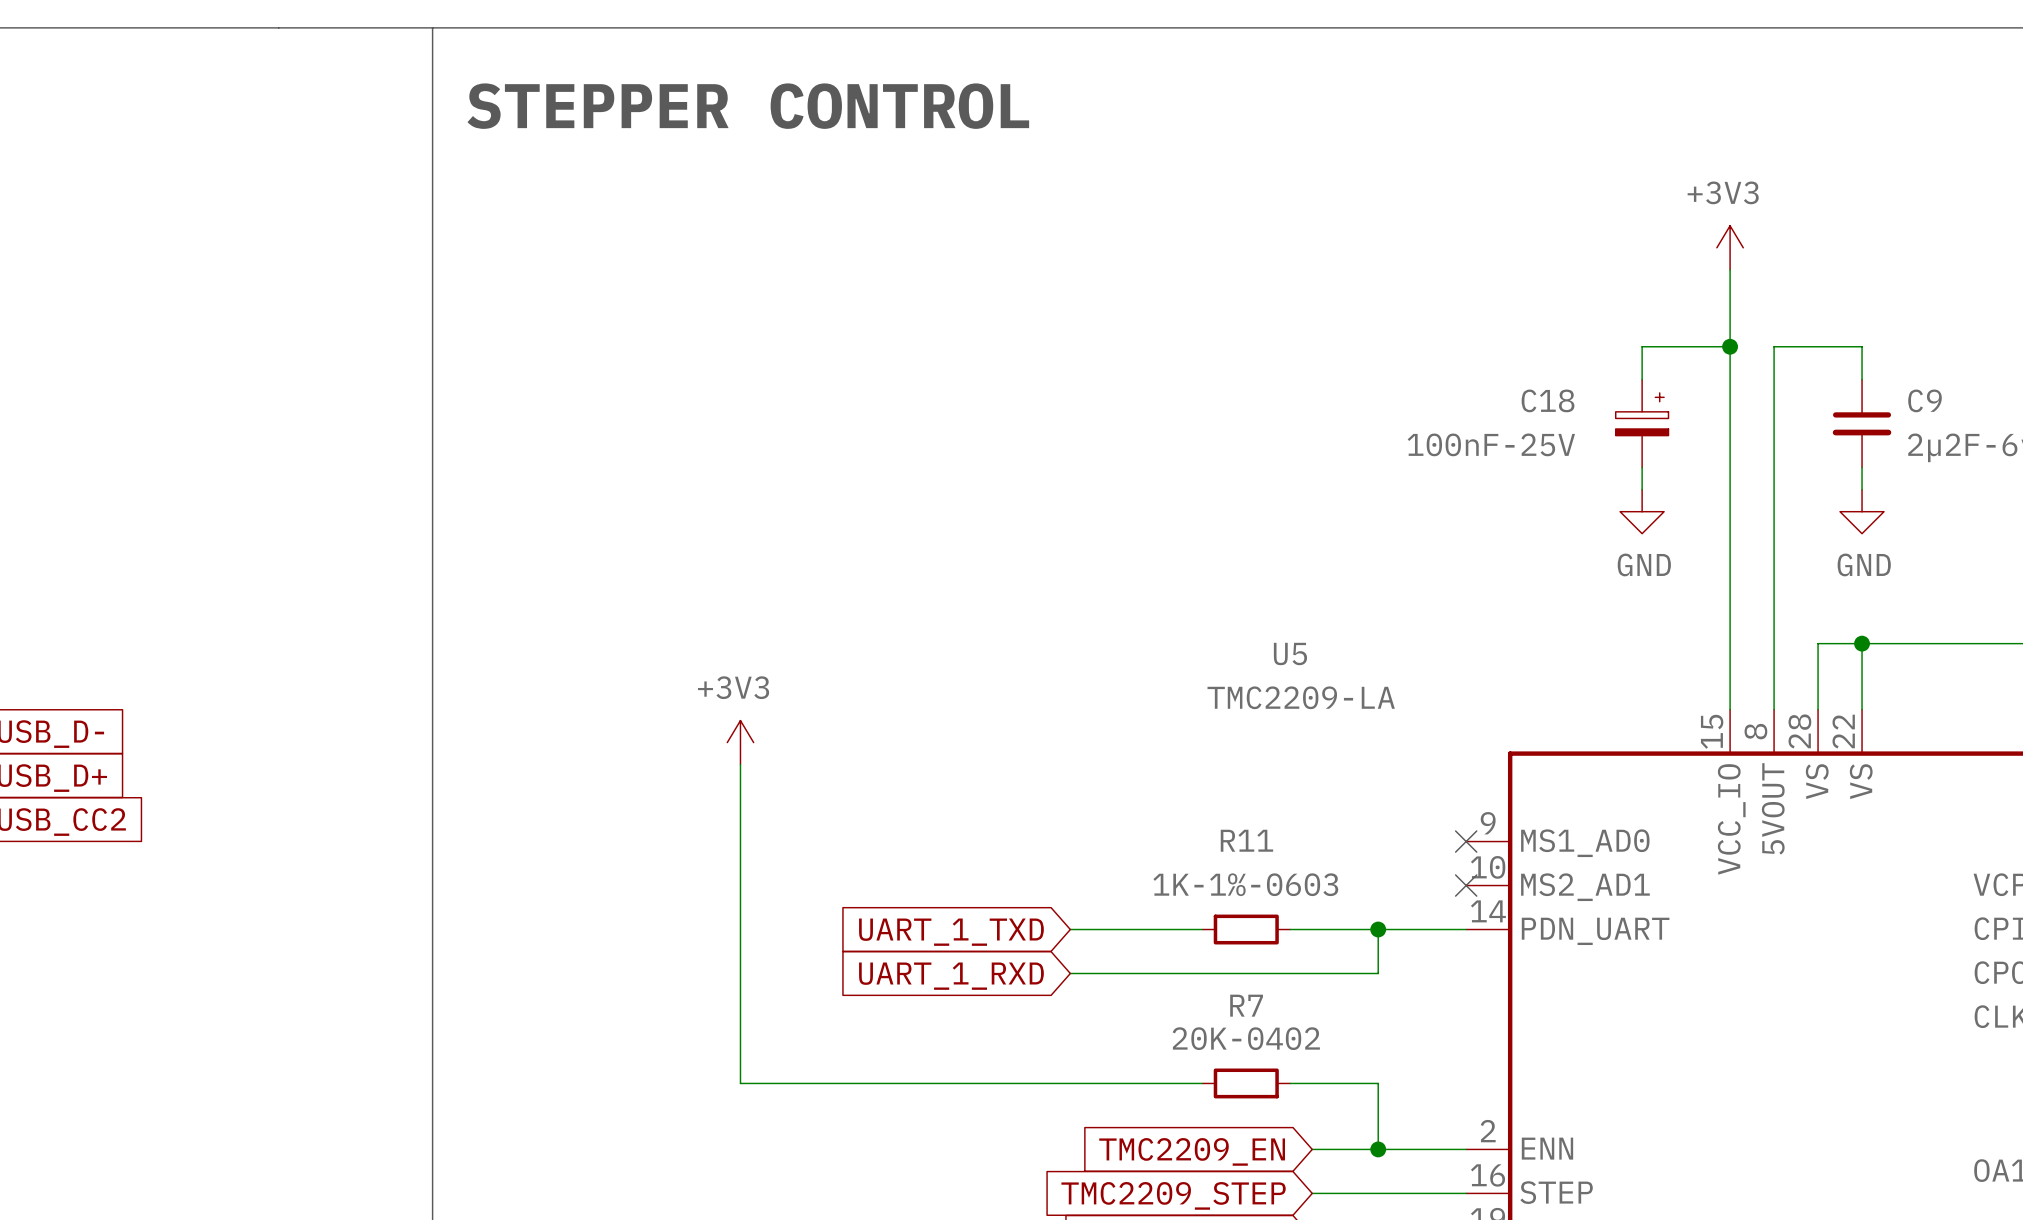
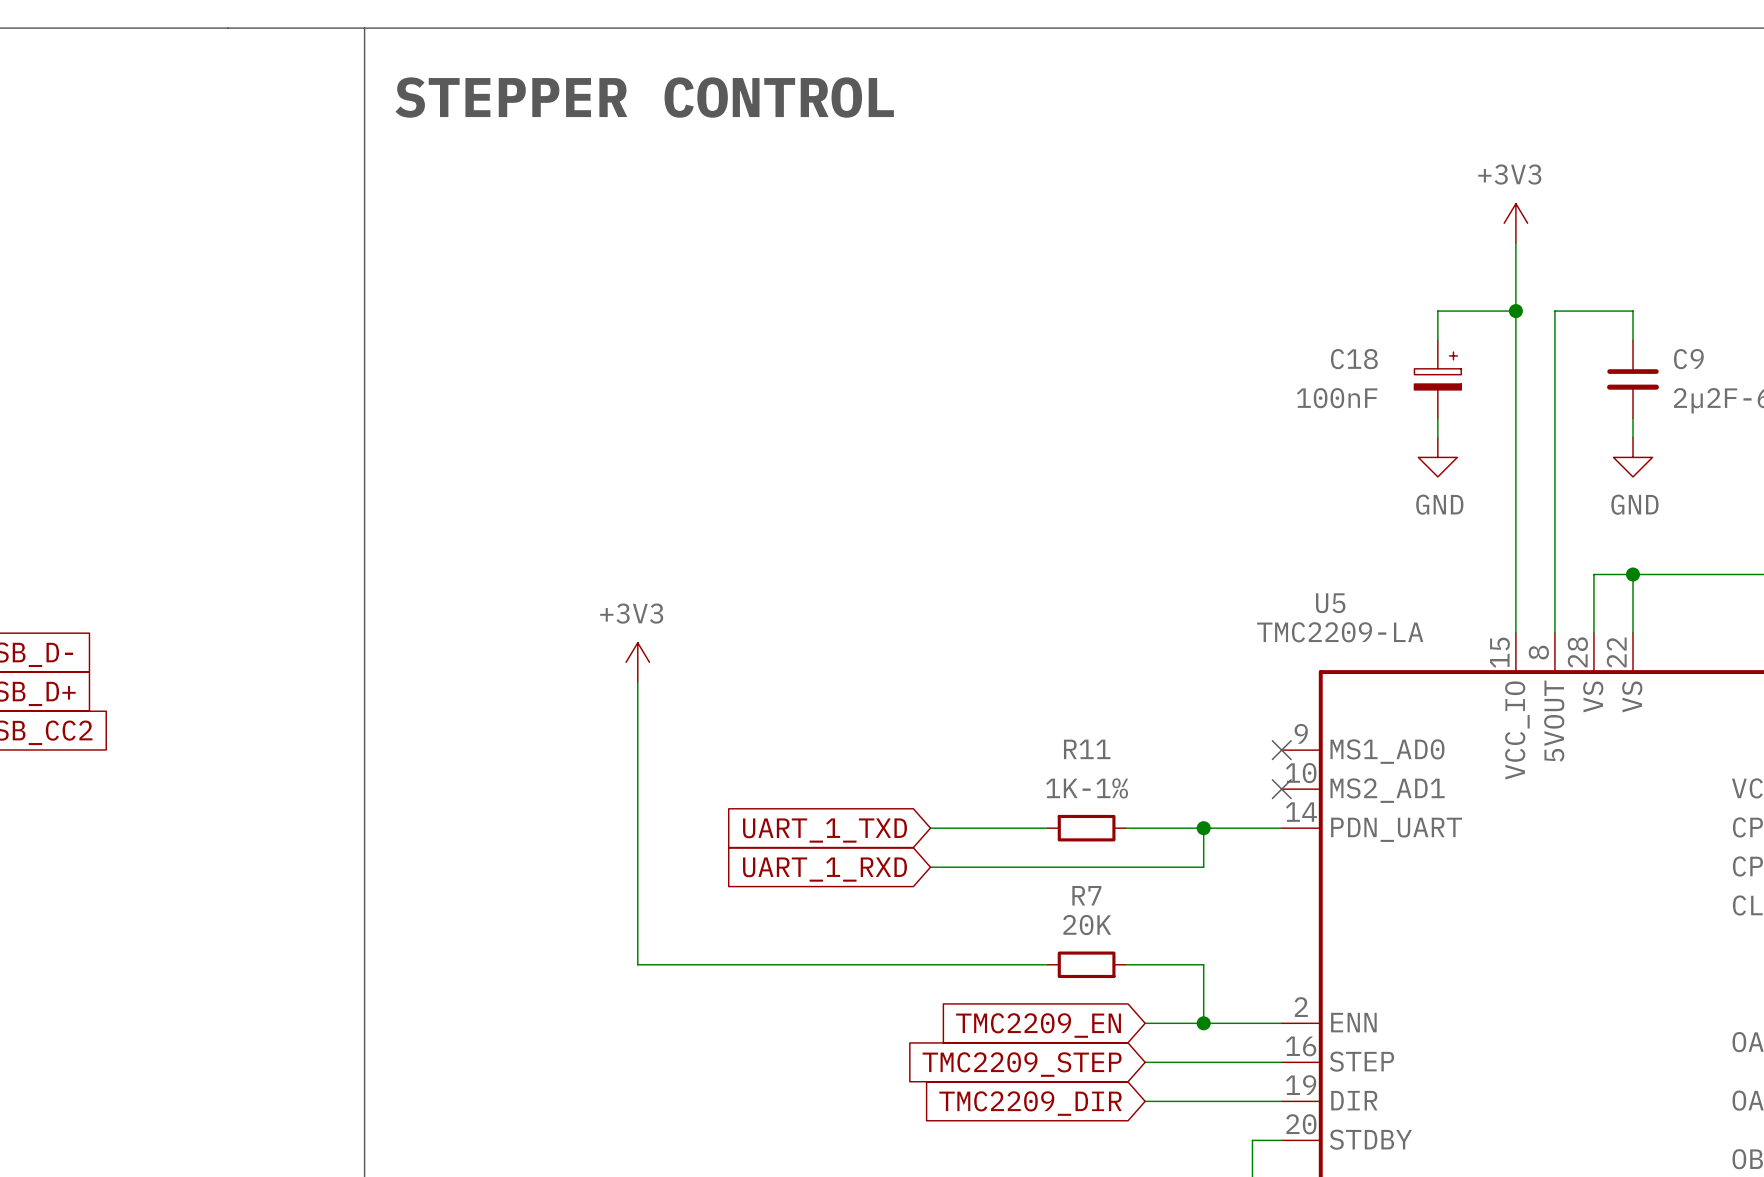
C18 value: 100nF-25V (1491, 444) -> 100nF (1337, 398)
U5 name position: U5 (1290, 654) -> U5 (1330, 603)
U5 value position: TMC2209-LA (1301, 697) -> TMC2209-LA (1340, 632)
R11 value: 1K-1%-0603 (1245, 884) -> 1K-1% (1087, 788)
R7 value: 20K-0402 (1246, 1038) -> 20K (1087, 925)

